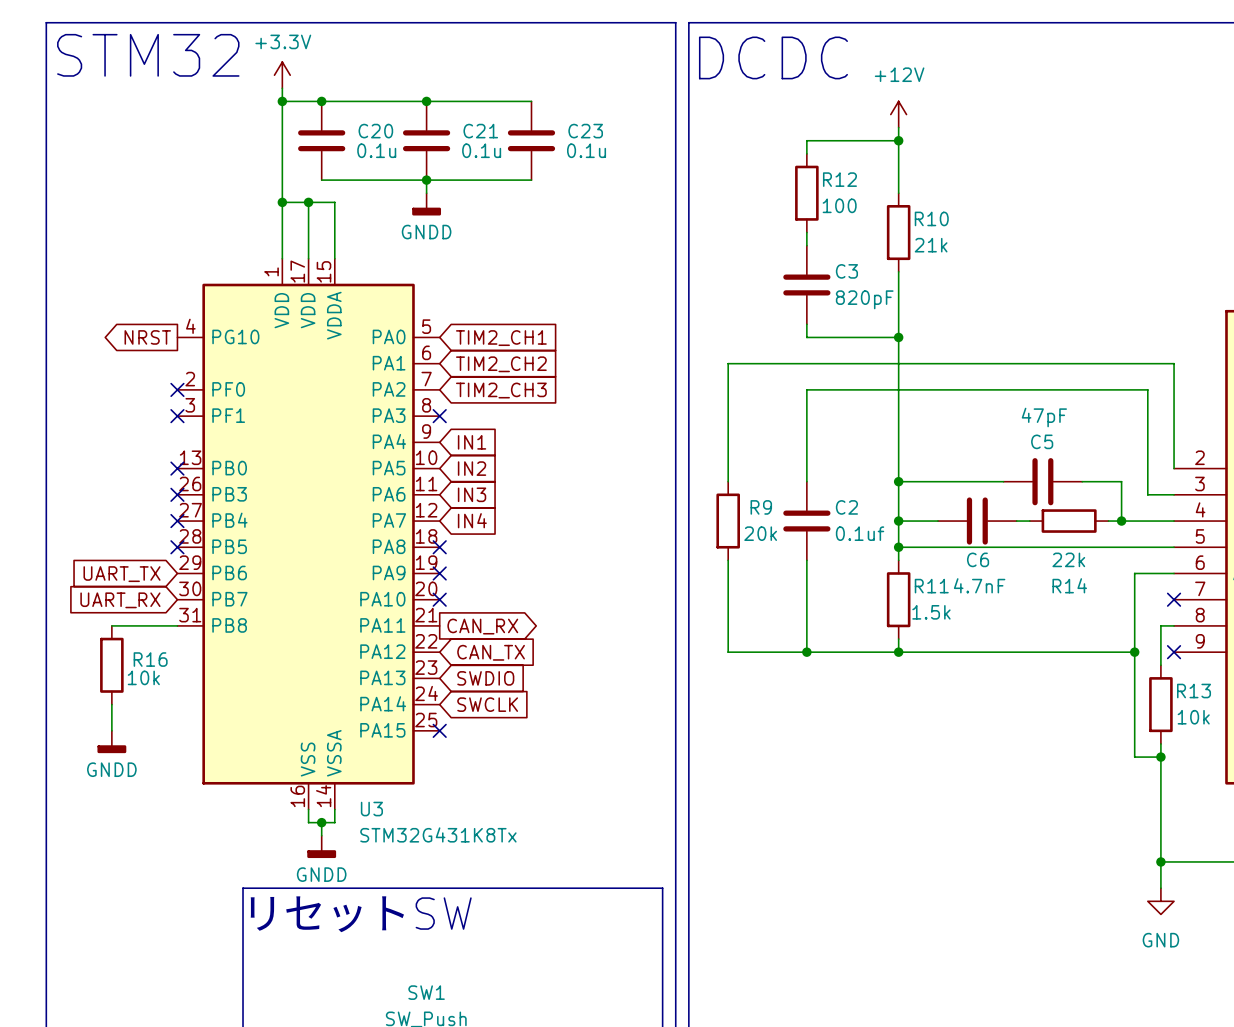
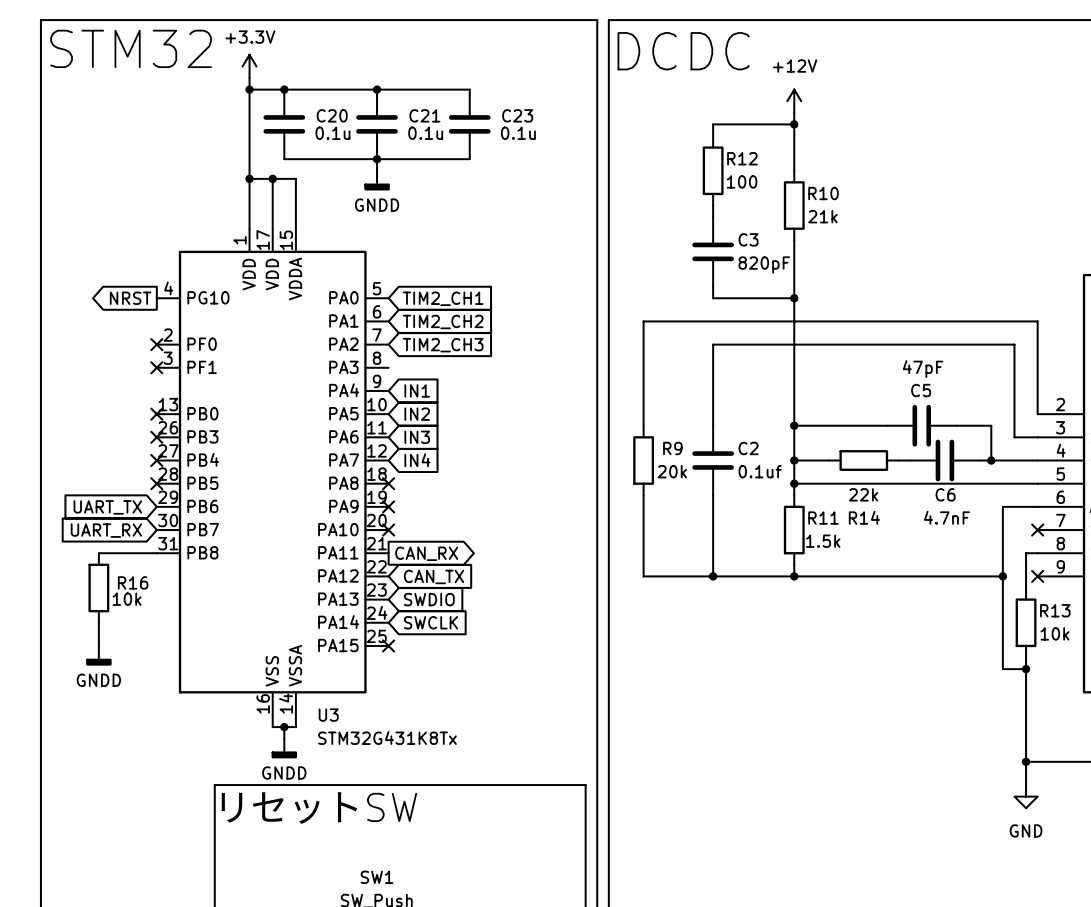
no-connect mark: (439, 416) -> none
C6 position: (977, 521) -> (944, 460)
R14 position: (1069, 521) -> (863, 460)

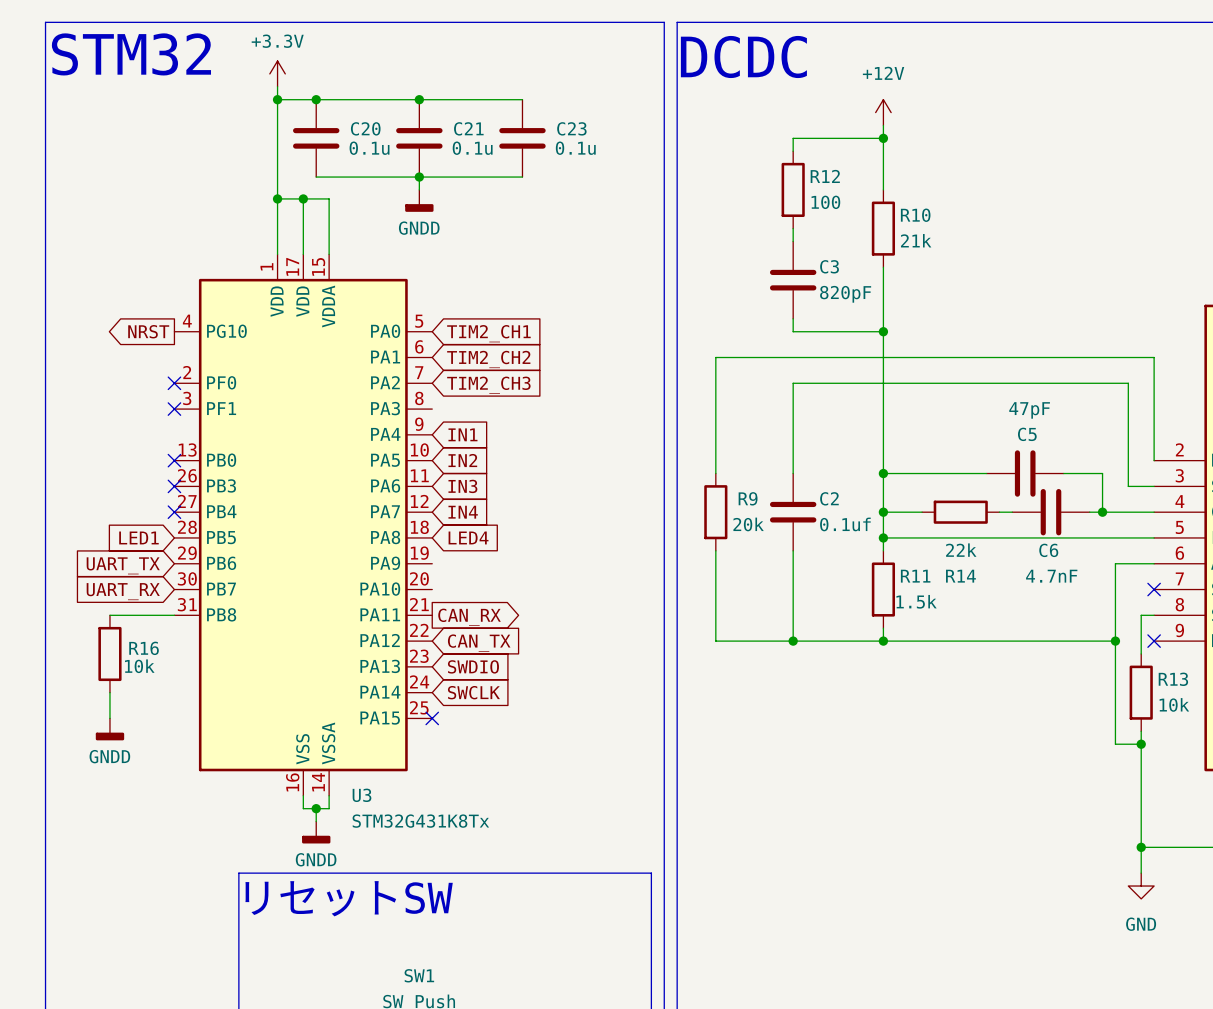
global label: none -> LED1 (138, 537)
no-connect mark: (156, 483) -> none
no-connect mark: (388, 483) -> none
global label: none -> LED4 (468, 537)
no-connect mark: (388, 506) -> none
no-connect mark: (388, 530) -> none

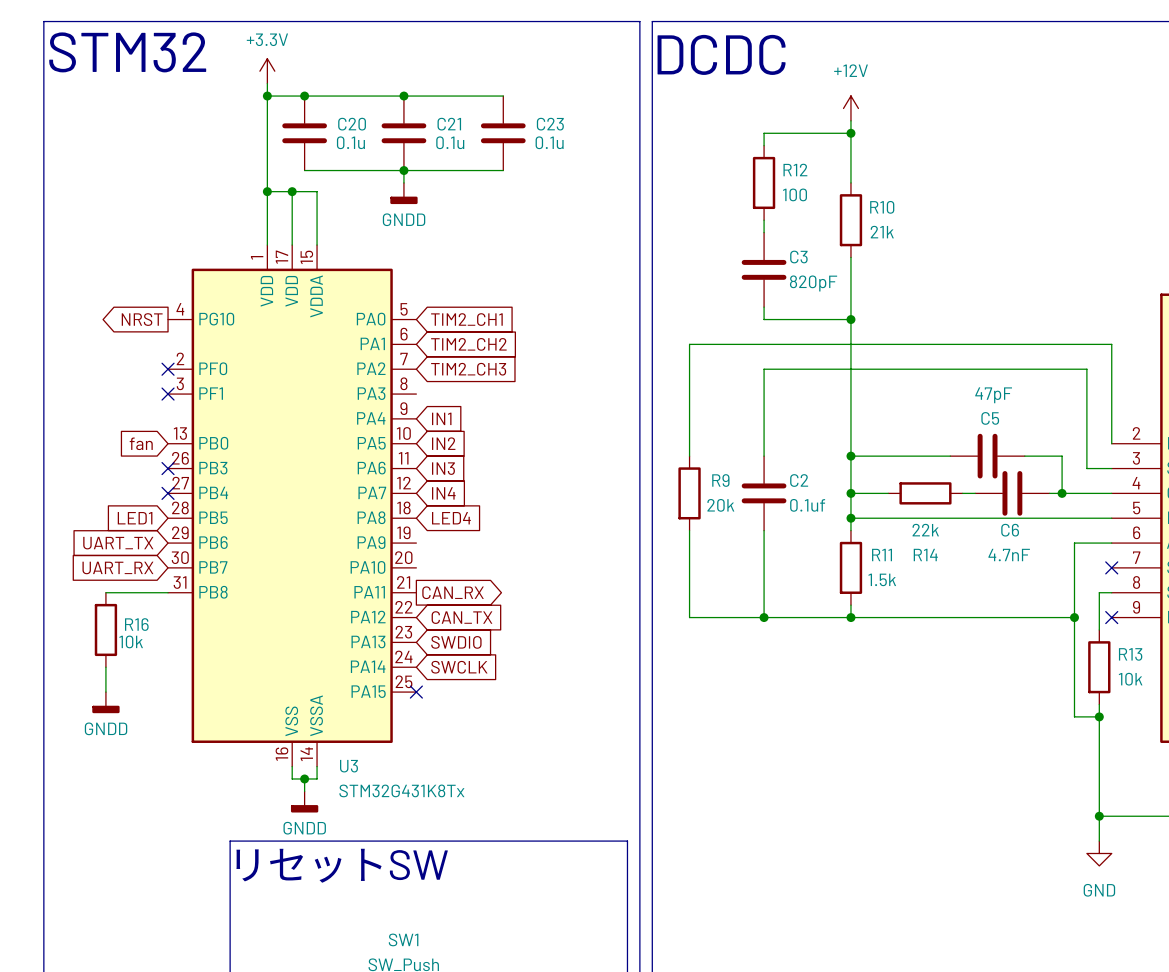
global label: none -> fan (141, 443)
no-connect mark: (174, 460) -> none

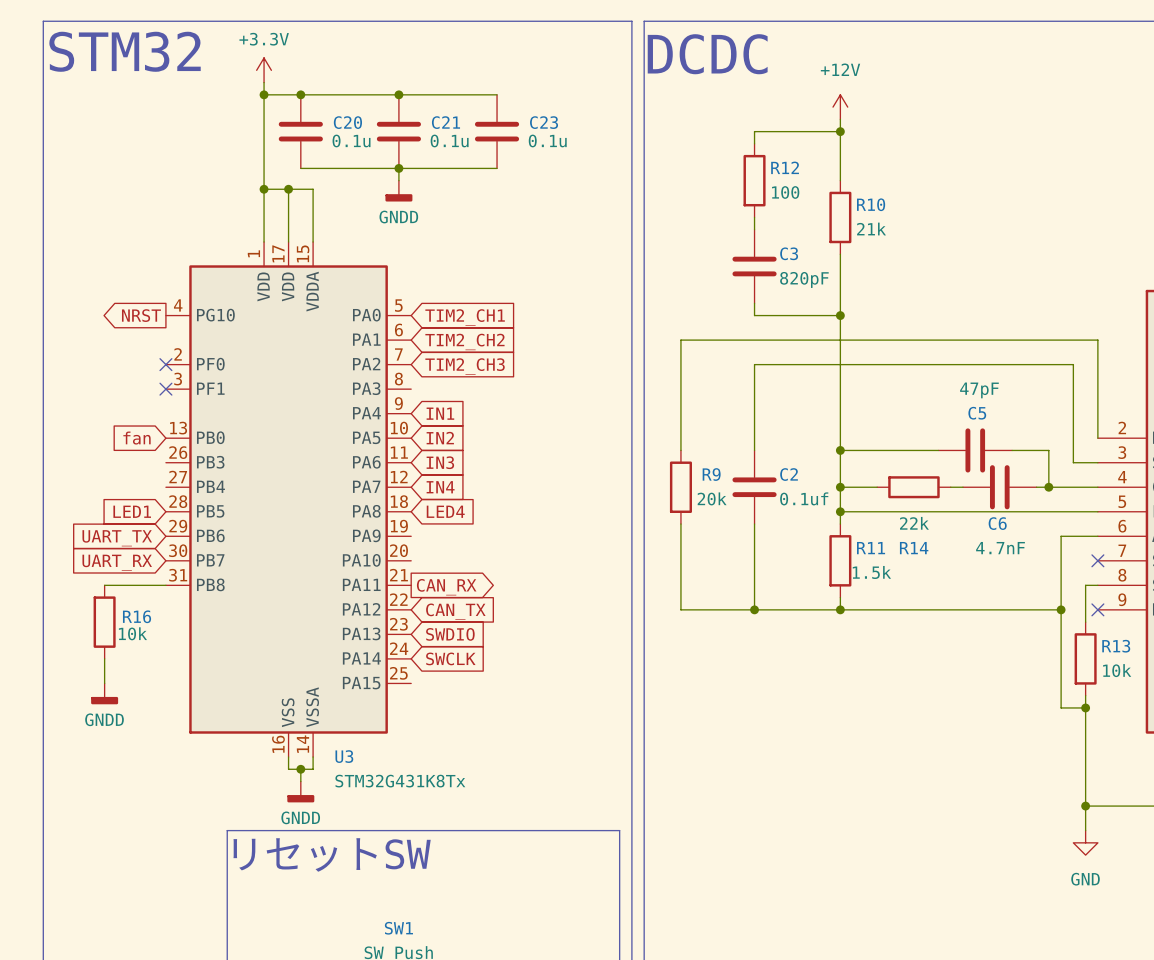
no-connect mark: (168, 468) -> none
no-connect mark: (168, 493) -> none
no-connect mark: (416, 692) -> none

